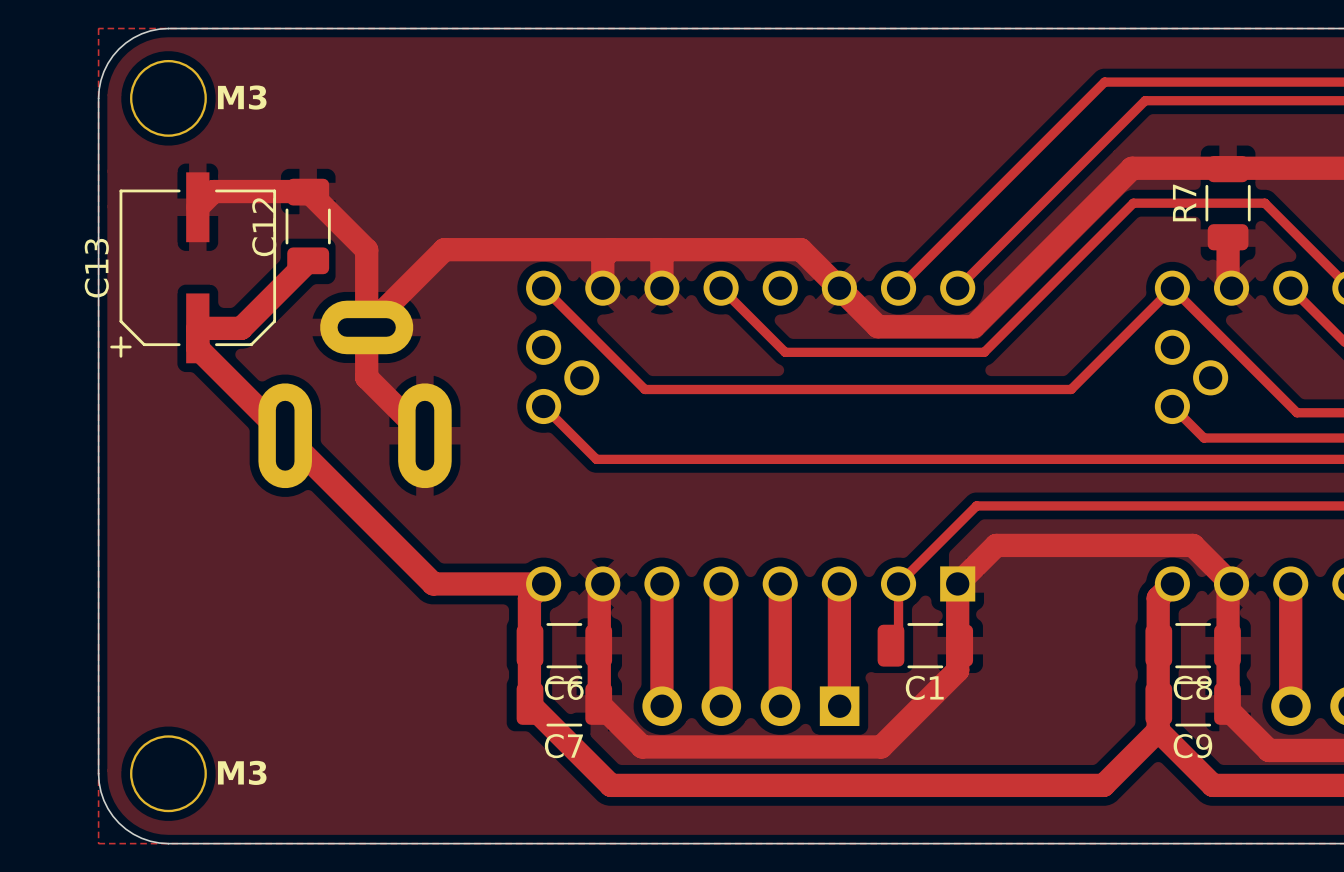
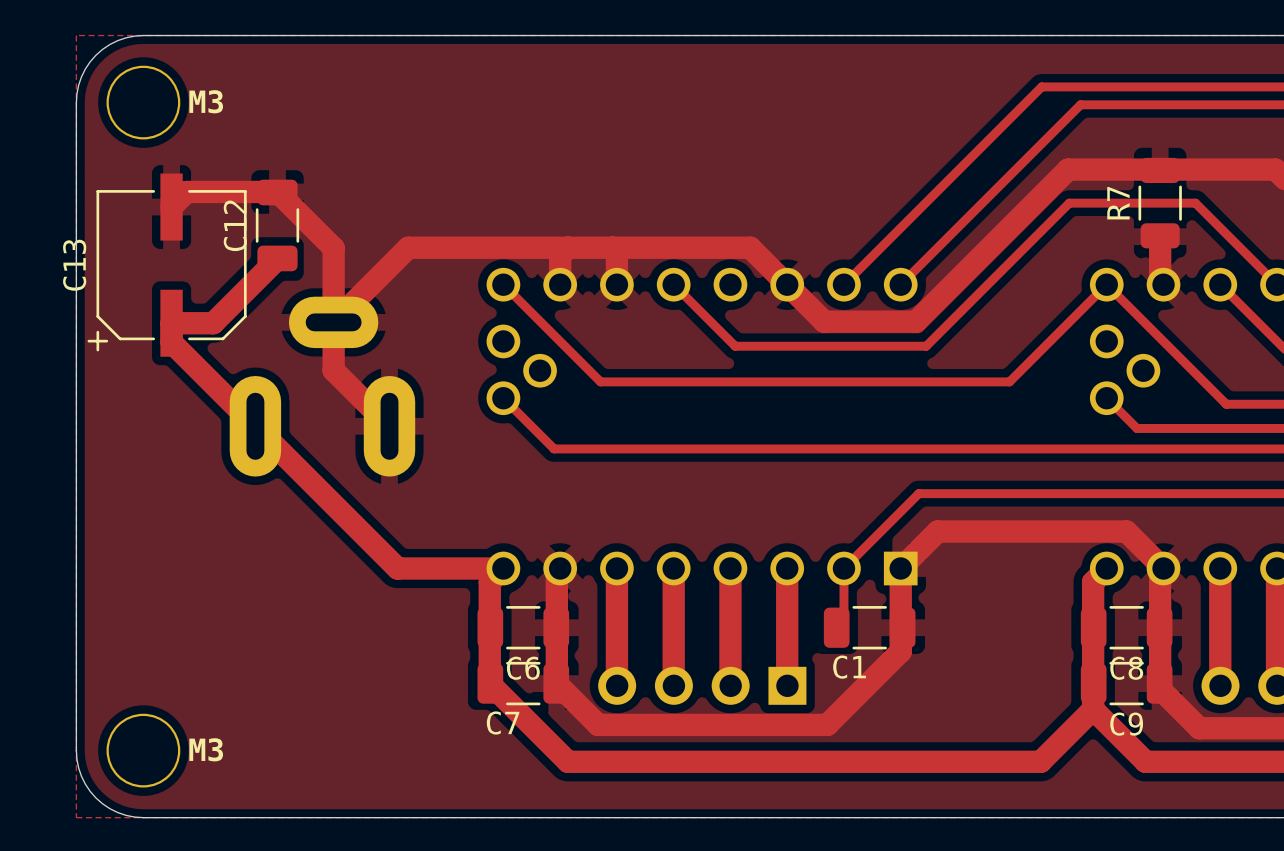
C1 name position: C1 (924, 687) -> C1 (849, 667)
C7 name position: C7 (563, 746) -> C7 (503, 722)

